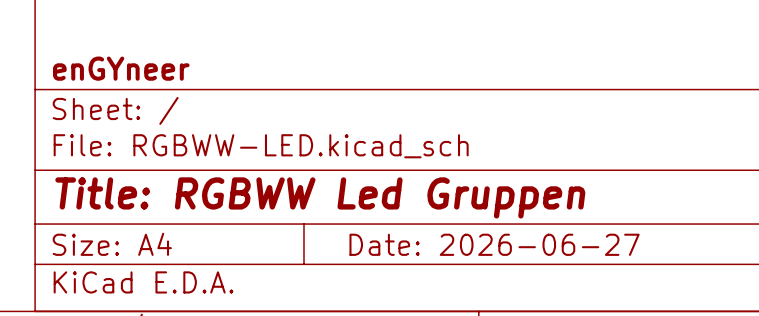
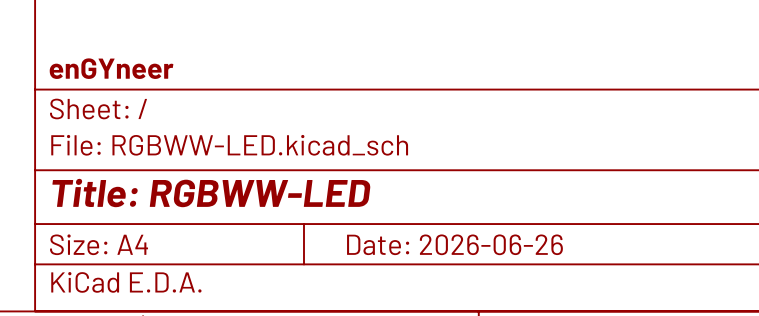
title block: Title: RGBWW Led Gruppen (320, 197) -> Title: RGBWW-LED (211, 193)
title block: Date: 2026-06-27 (494, 244) -> Date: 2026-06-26 (454, 244)

